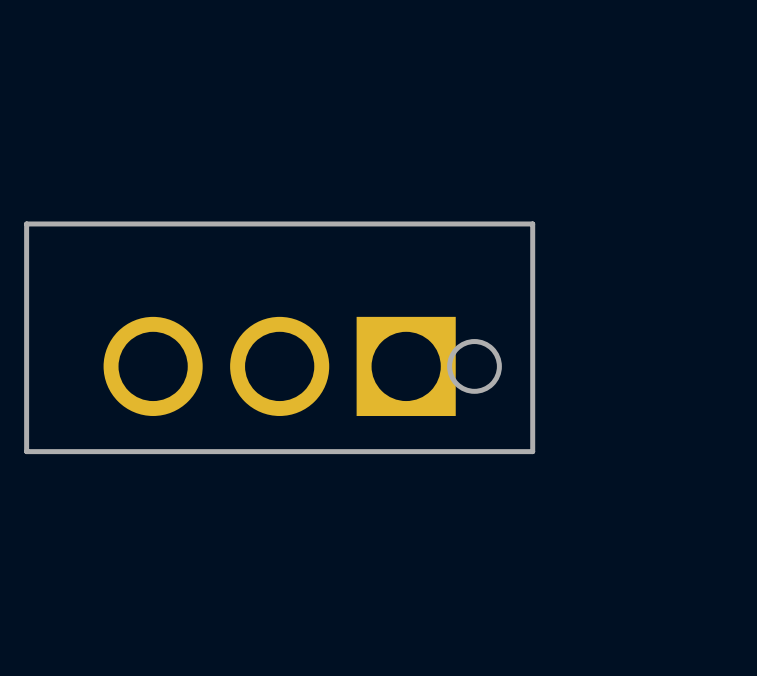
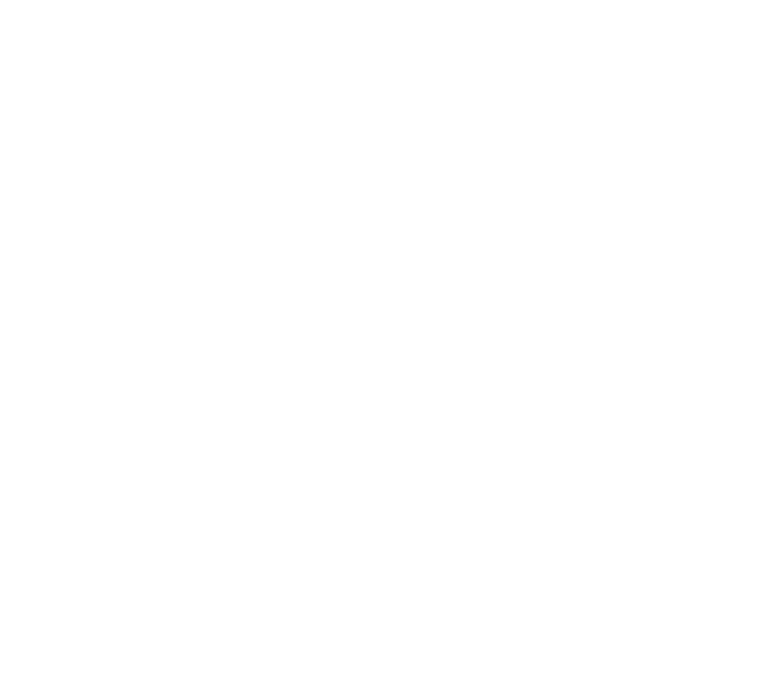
part: (279, 337) -> none

